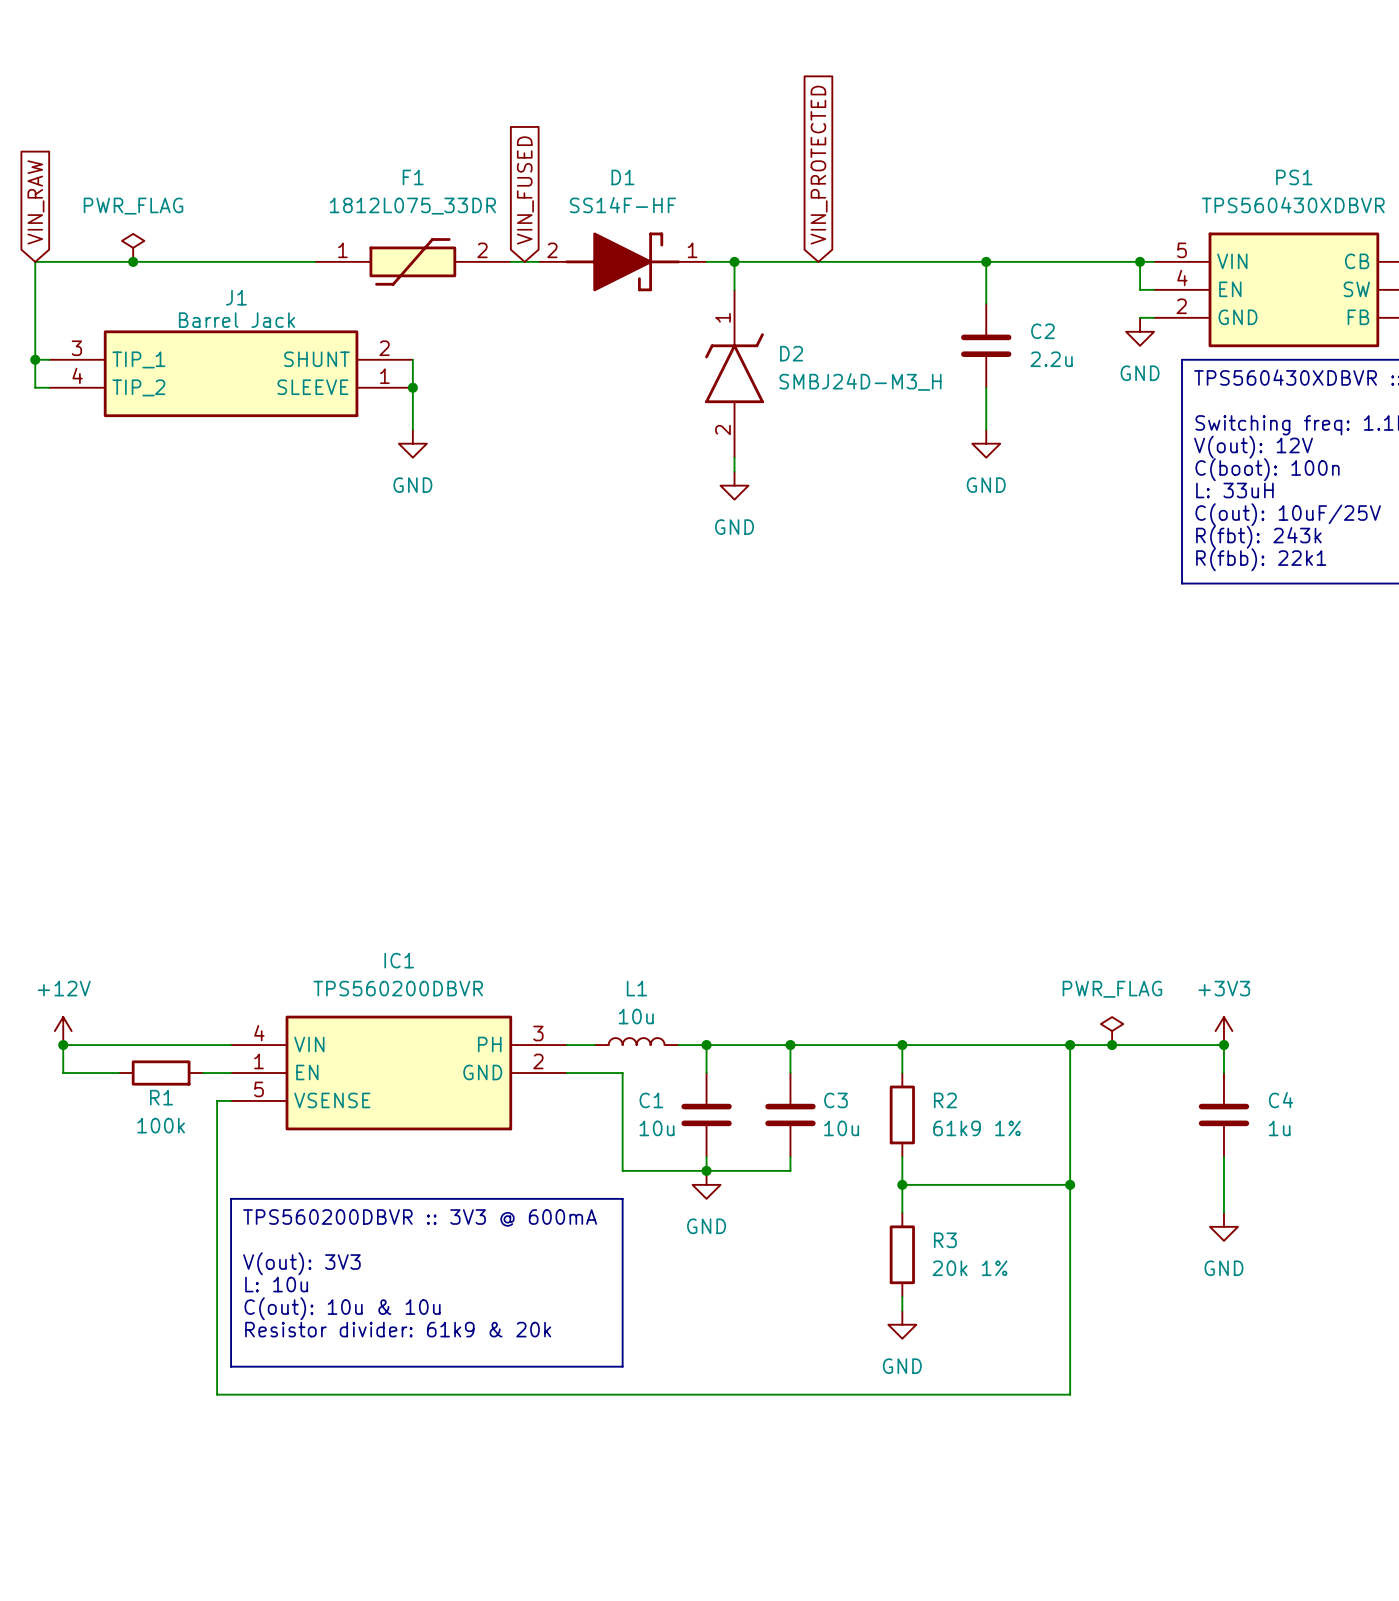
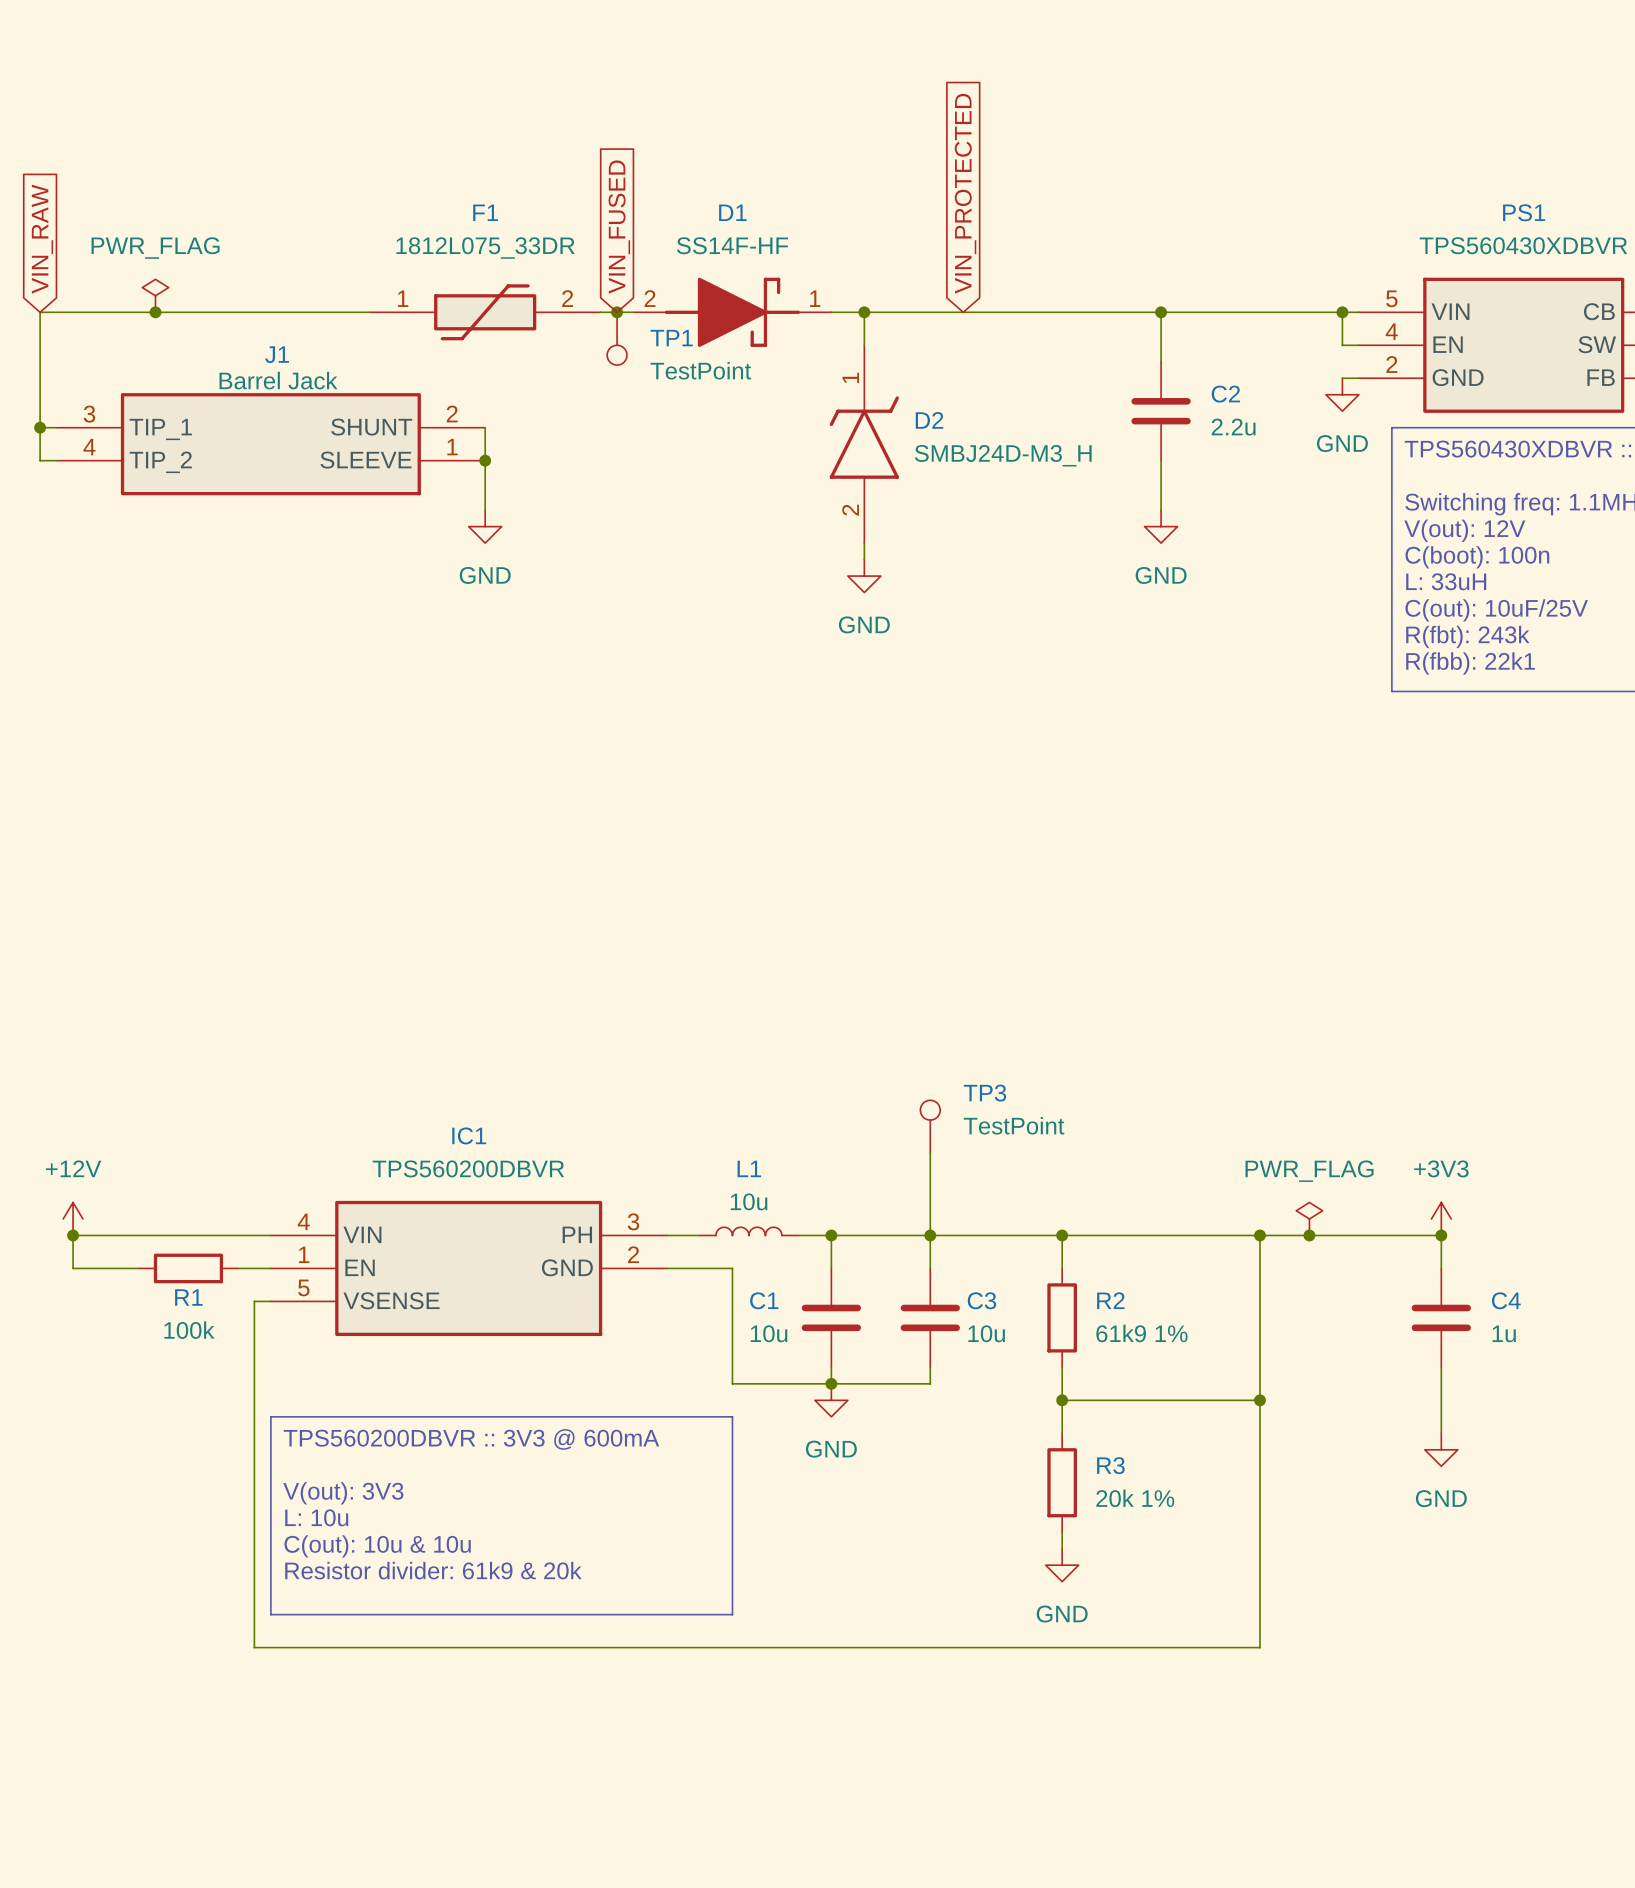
junction: none -> (617, 312)
TP1: none -> TestPoint (617, 338)
TP3: none -> TestPoint (930, 1126)
wire: none -> (930, 1153) (930, 1235)

